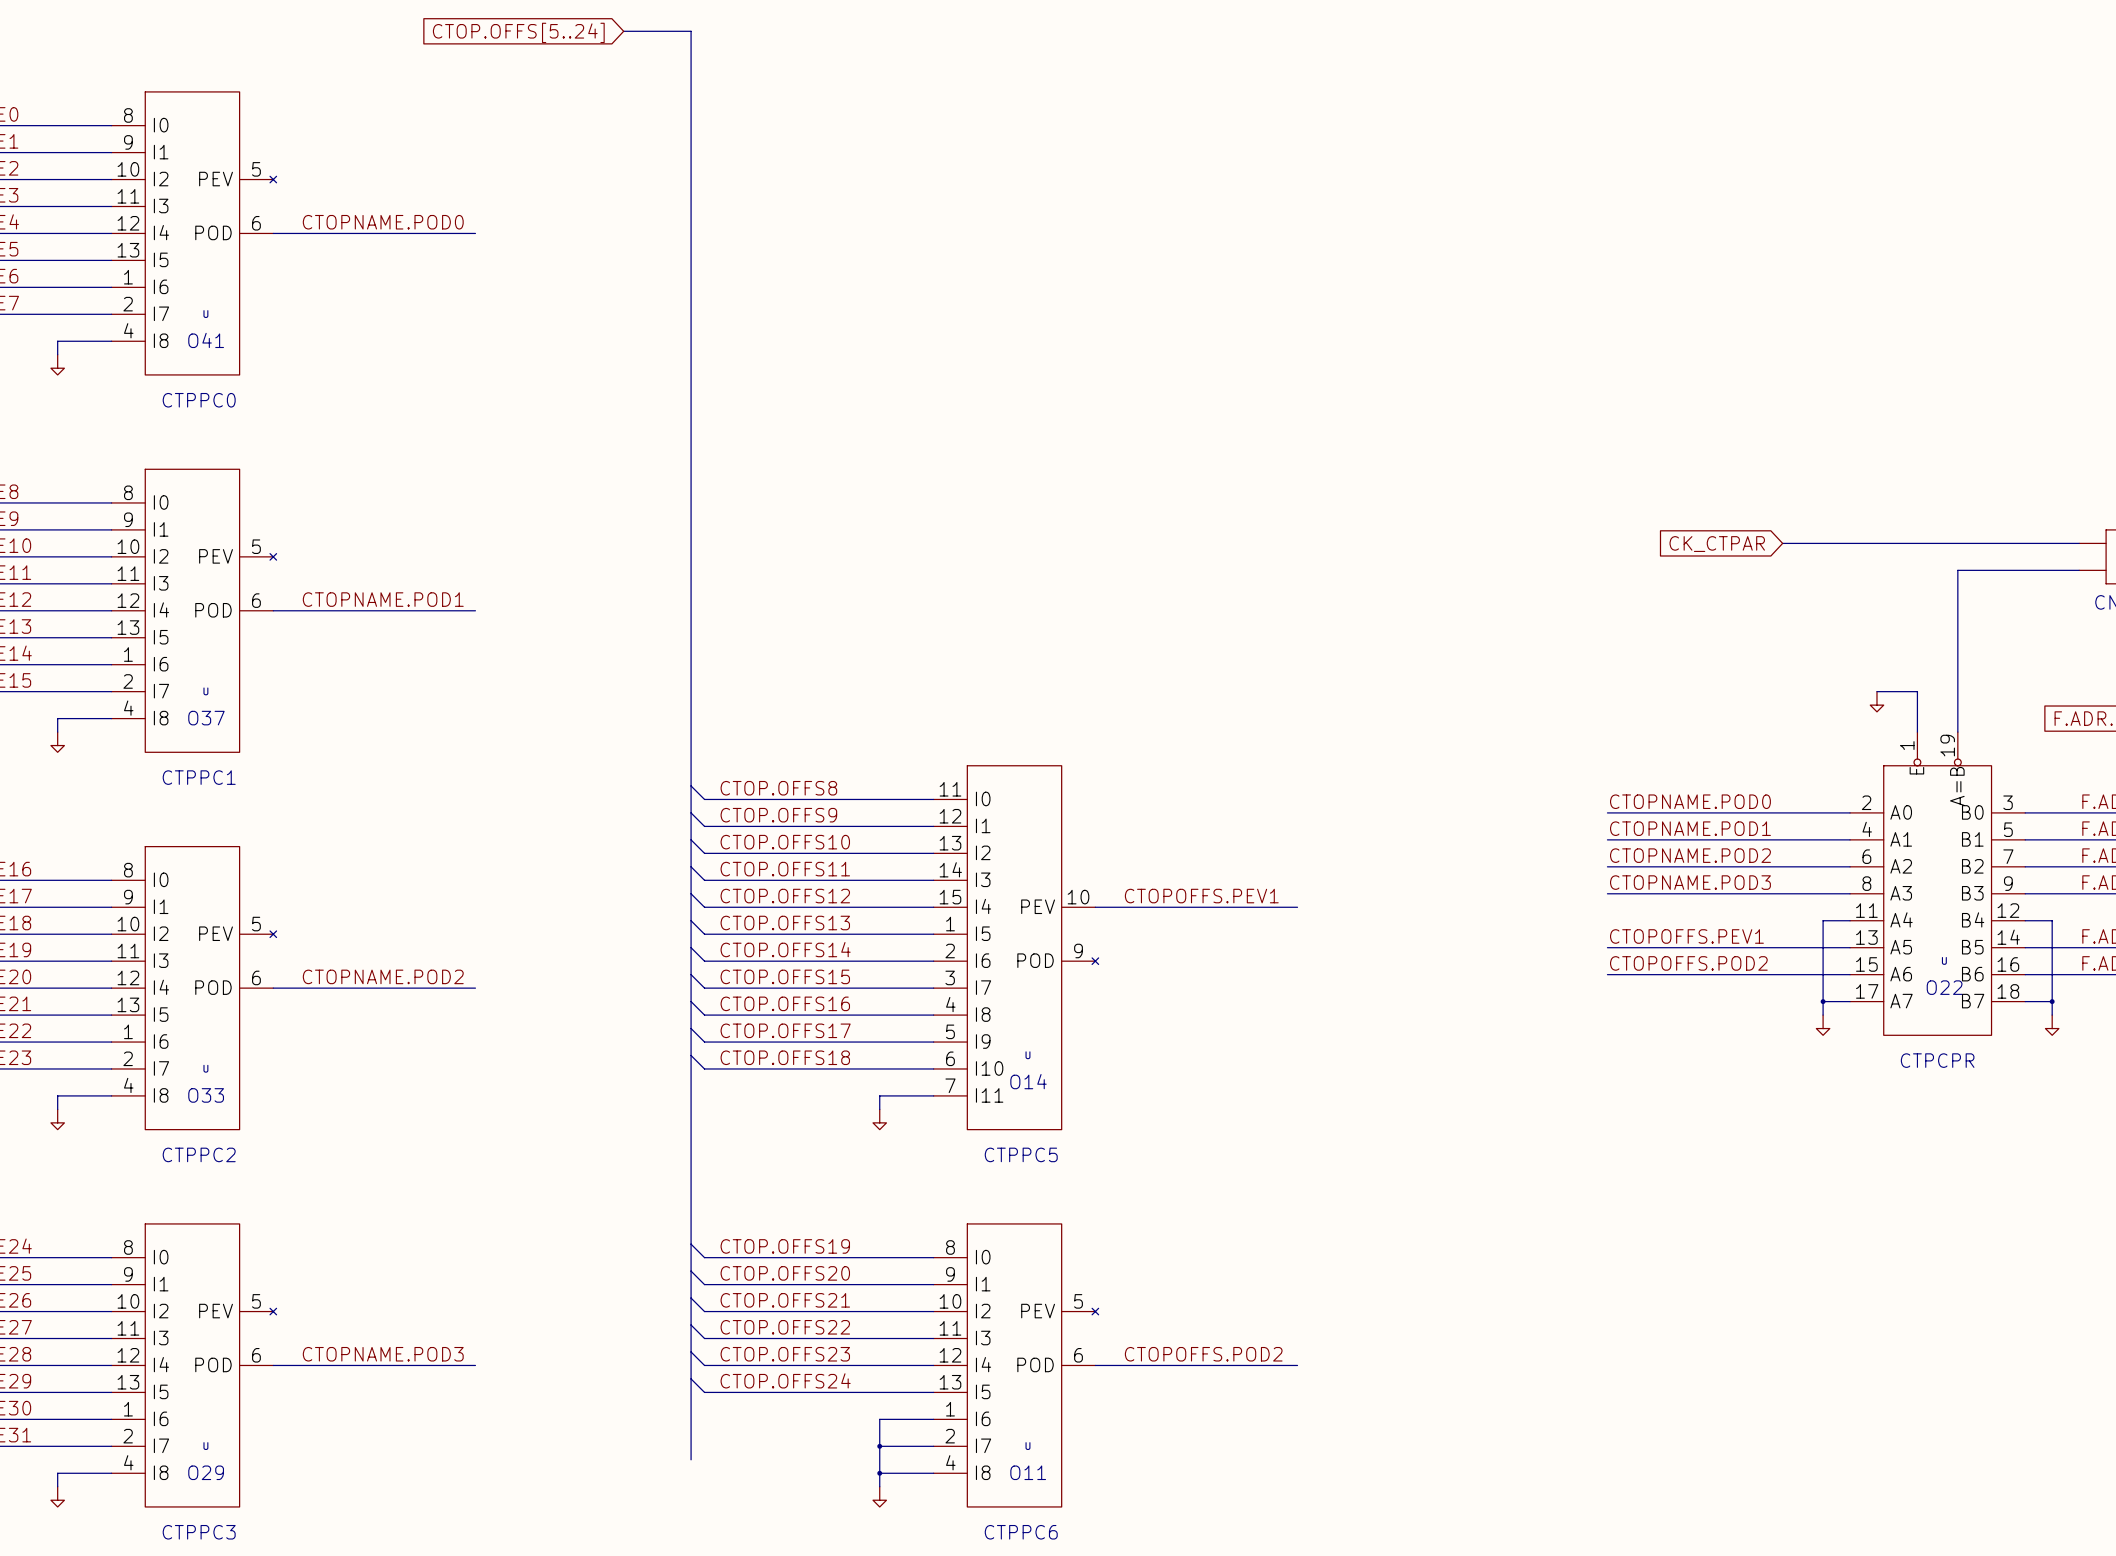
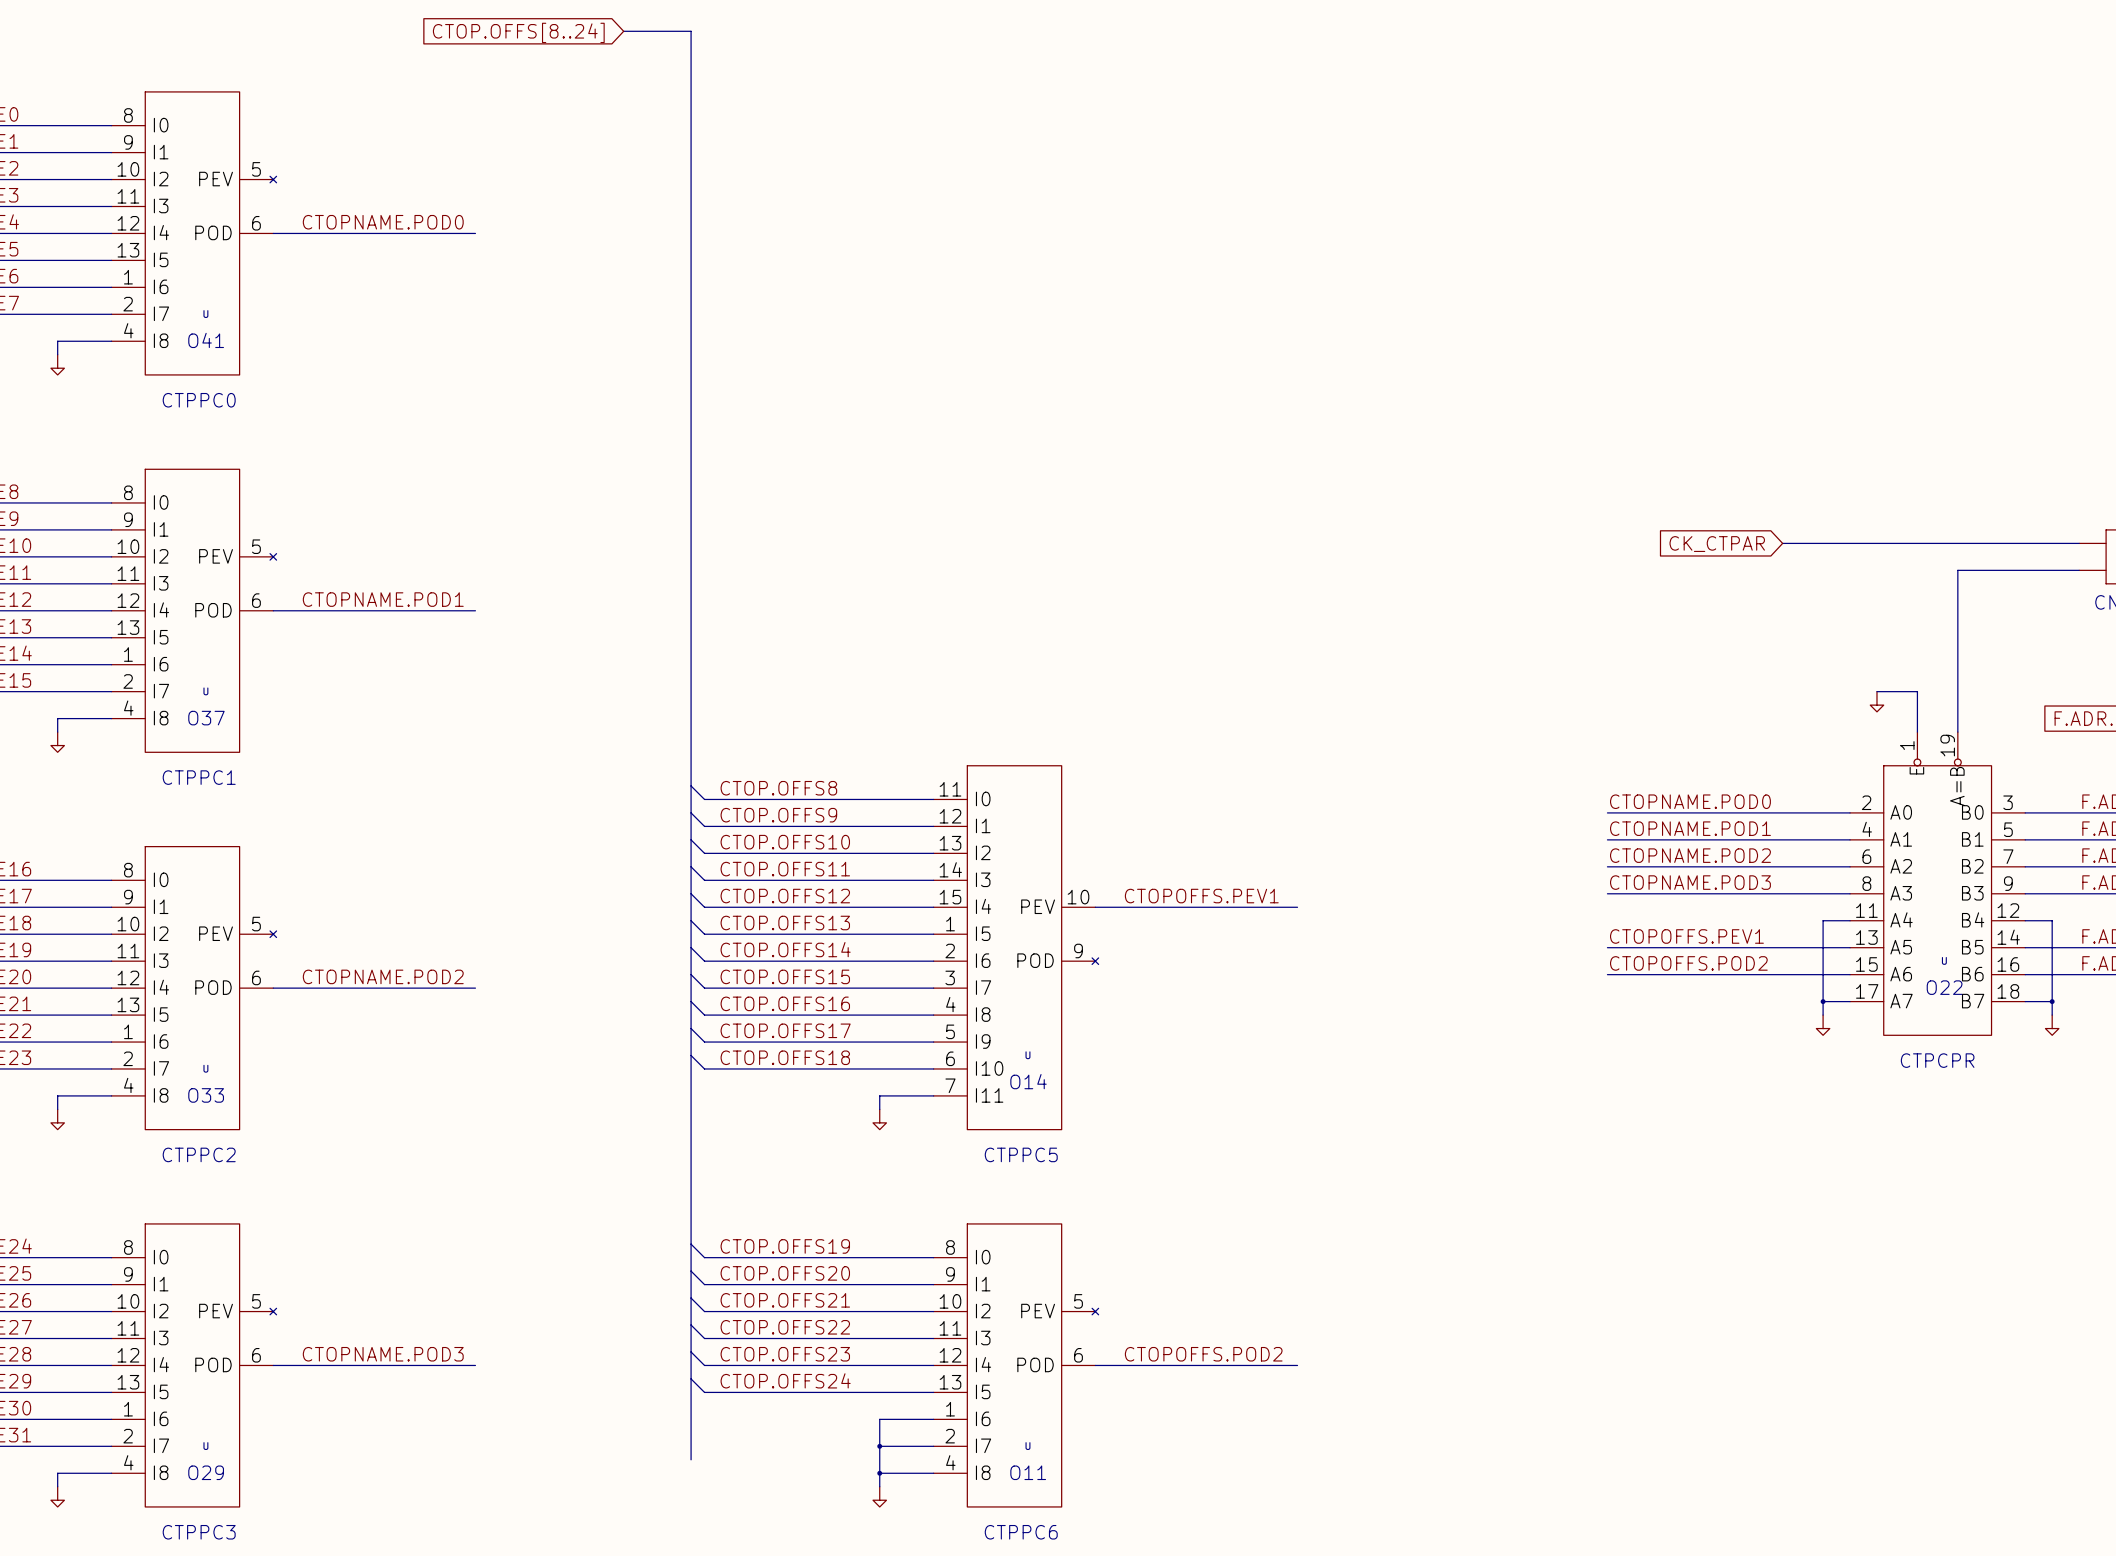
global label: CTOP.OFFS[5..24] (518, 32) -> CTOP.OFFS[8..24] (518, 32)

